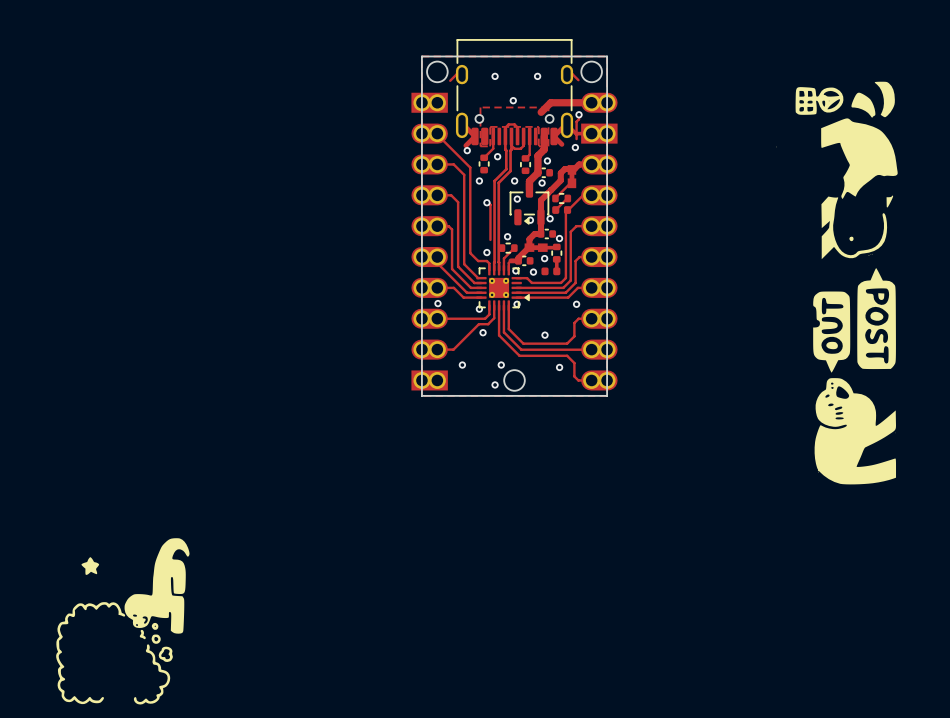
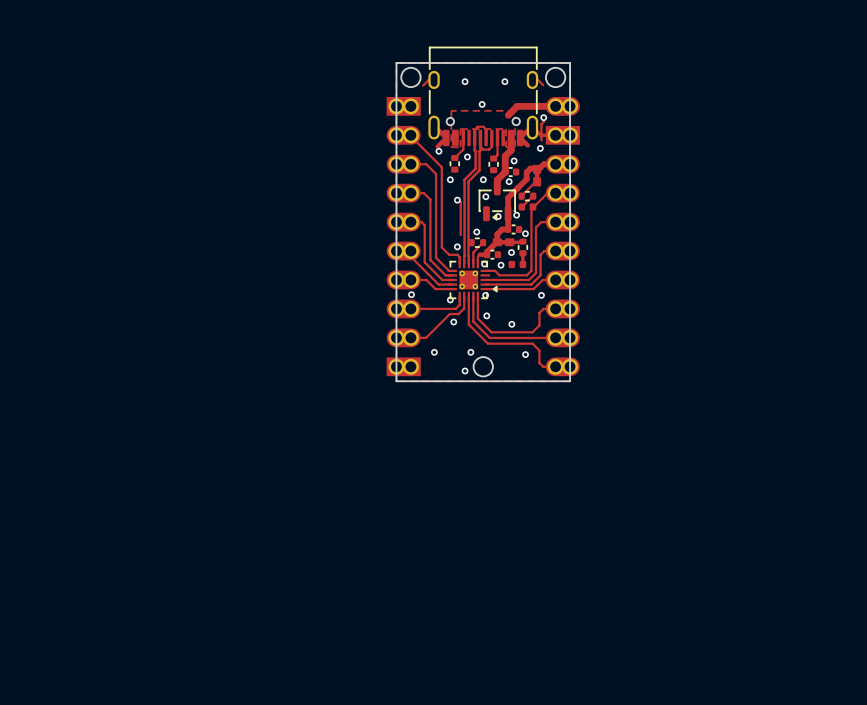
drawing: [776, 81, 898, 485] -> none
via: none -> (486, 315)
drawing: [56, 538, 190, 705] -> none

